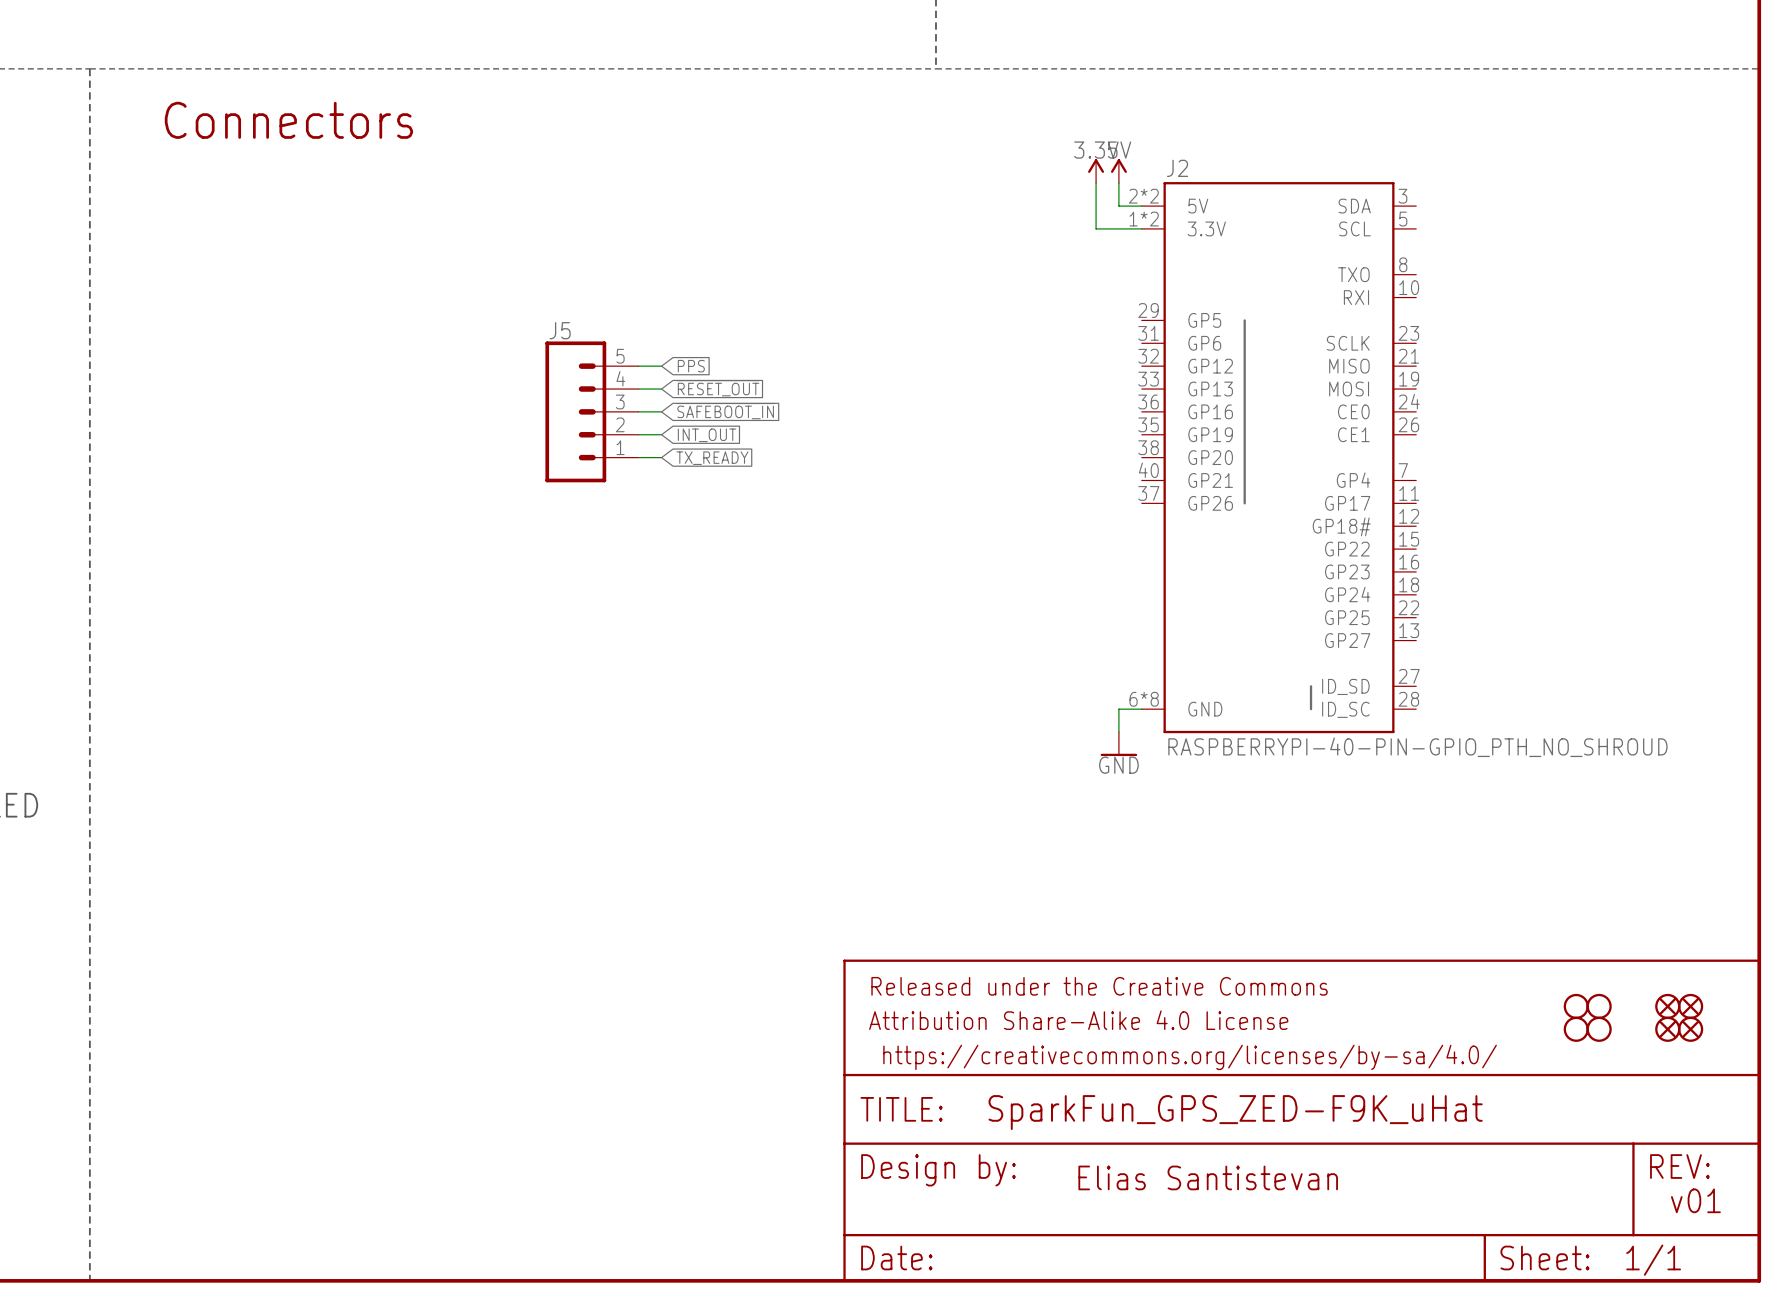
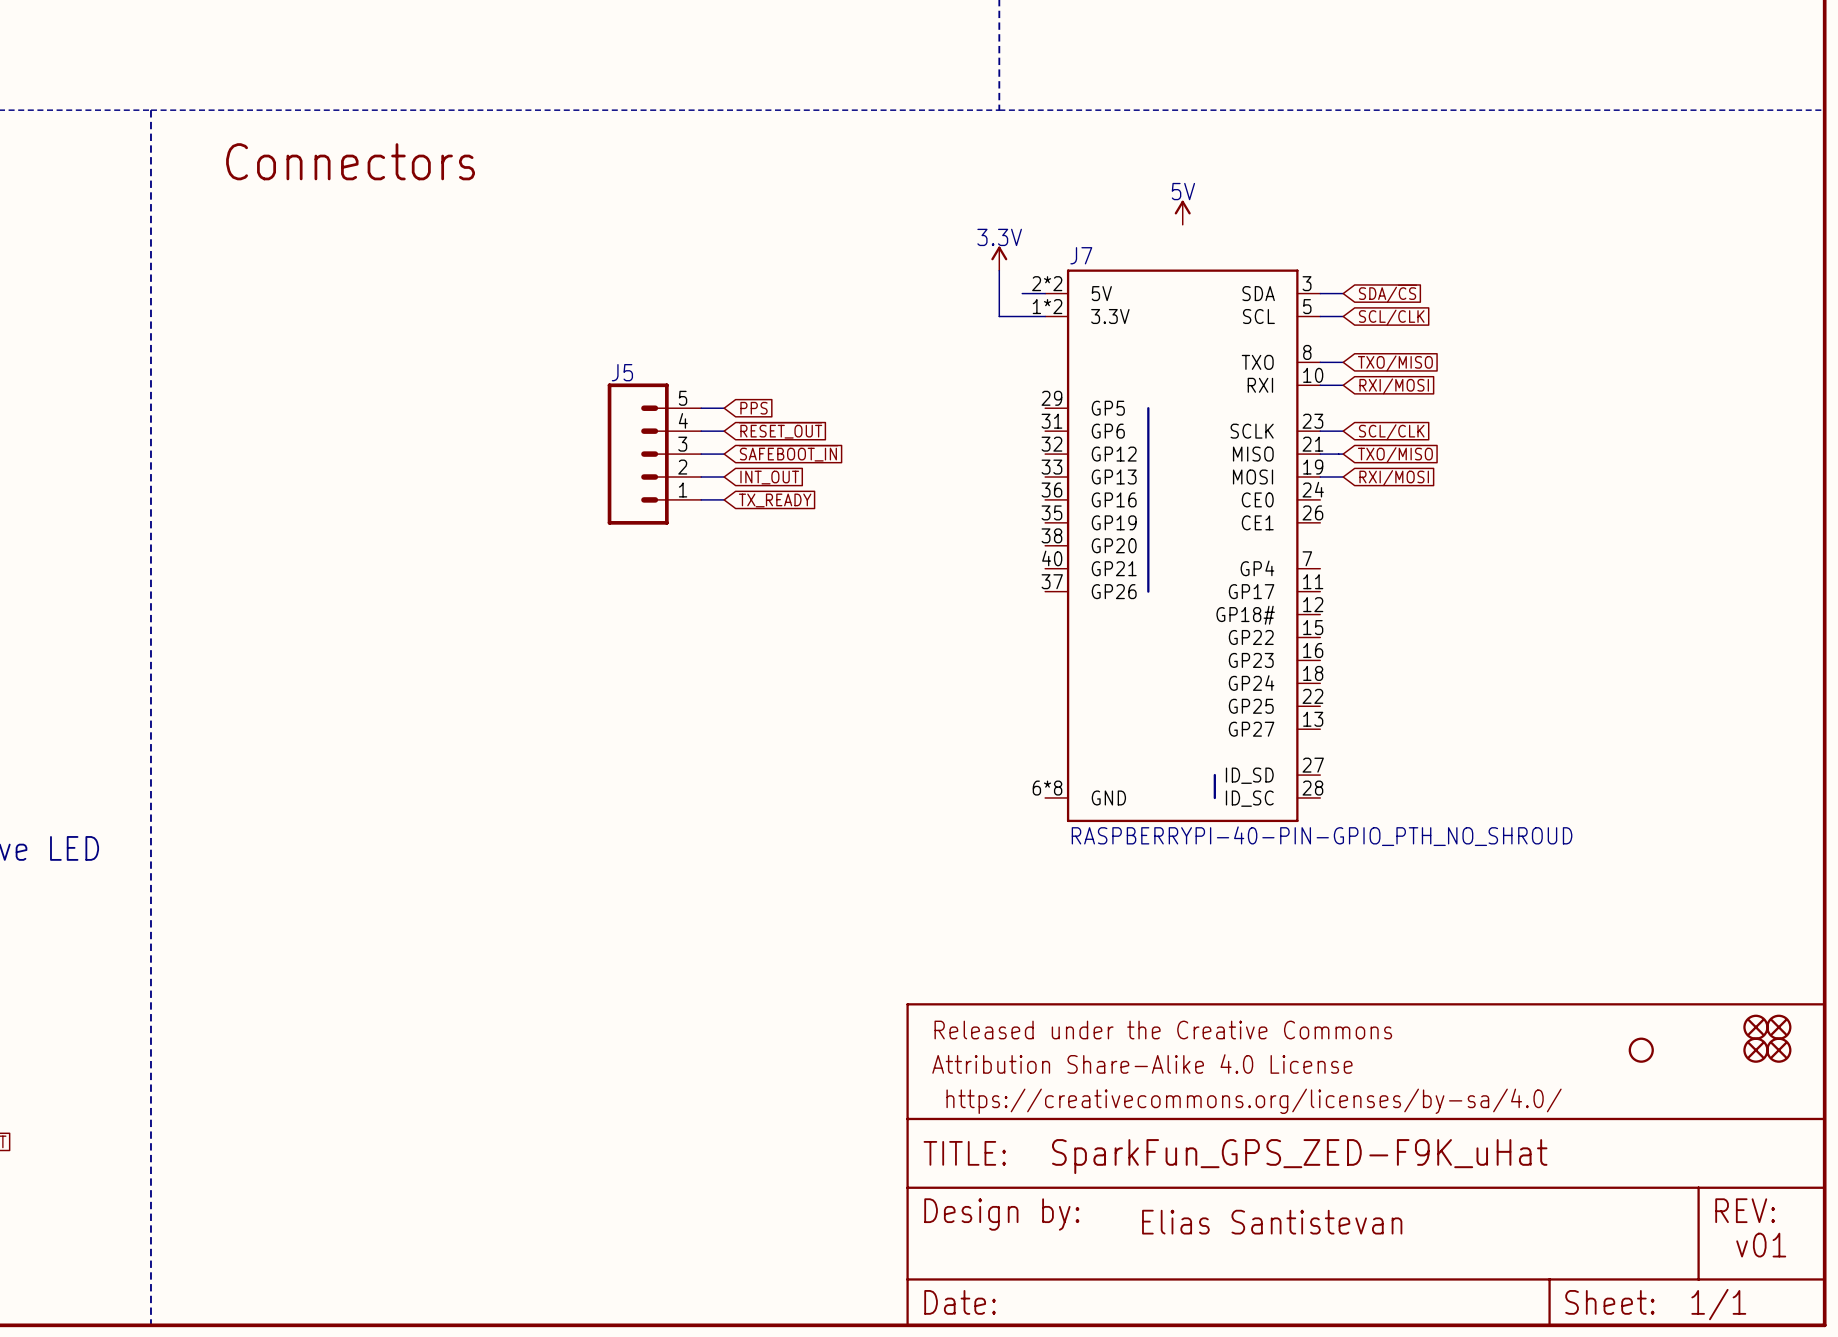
power symbol position: 3.3V (1096, 171) -> 3.3V (999, 258)
wire: (1096, 183) (1096, 228) (1141, 228) -> (999, 270) (999, 316) (1045, 316)
wire: (1118, 183) (1118, 206) (1141, 206) -> none
wire: none -> (1022, 293) (1045, 293)
wire: none -> (1320, 293) (1343, 293)
global label: none -> SDA/~{CS} (1388, 293)
wire: none -> (1320, 316) (1343, 316)
global label: none -> SCL/CLK (1391, 317)
wire: none -> (1320, 362) (1343, 362)
global label: none -> TXO/MISO (1395, 363)
wire: none -> (1320, 385) (1343, 385)
global label: none -> RXI/MOSI (1394, 386)
wire: none -> (1320, 431) (1343, 431)
global label: none -> SCL/CLK (1391, 432)
wire: none -> (1320, 454) (1343, 454)
global label: none -> TXO/MISO (1395, 455)
wire: none -> (1320, 477) (1343, 477)
global label: none -> RXI/MOSI (1394, 478)
J2: RASPBERRYPI-40-PIN-GPIO_PTH_NO_SHROUD (1279, 457) -> none
J7: none -> RASPBERRYPI-40-PIN-GPIO_PTH_NO_SHROUD (1182, 545)
wire: (1141, 709) (1118, 709) (1118, 732) -> none
power symbol: GND (1118, 744) -> none
part: none -> (1755, 1027)
part: none -> (1778, 1027)
part: (1599, 1006) -> none
part: (1667, 1006) -> none
part: none -> (1778, 1050)
part: (1576, 1029) -> none
part: (1599, 1029) -> none
part: (1667, 1029) -> none
part: (1690, 1029) -> none

